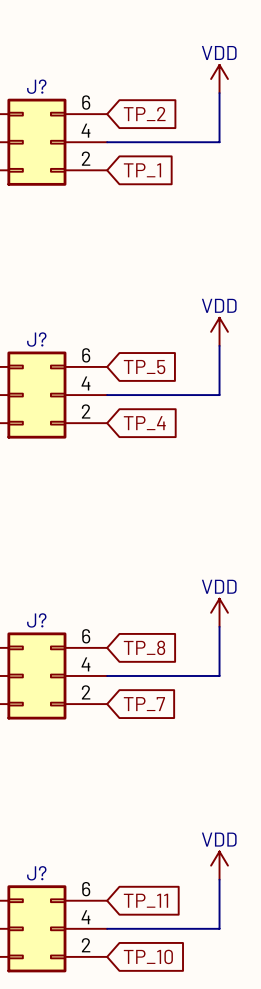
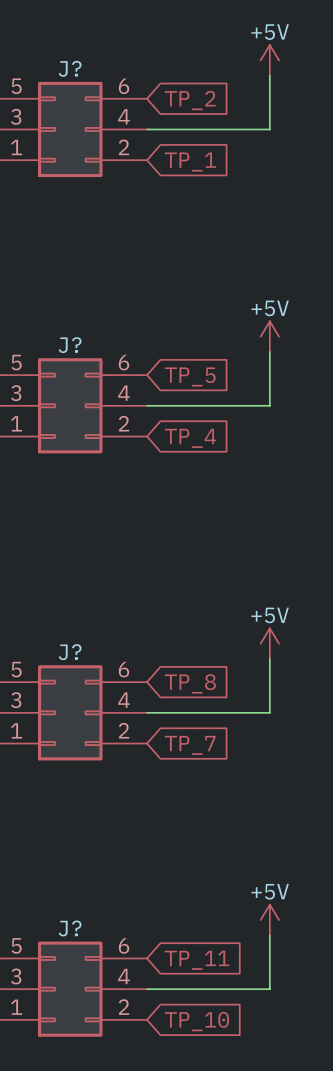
power symbol: VDD (219, 79) -> +5V (269, 60)
power symbol: VDD (219, 331) -> +5V (269, 336)
power symbol: VDD (219, 612) -> +5V (269, 643)
power symbol: VDD (219, 865) -> +5V (269, 920)

